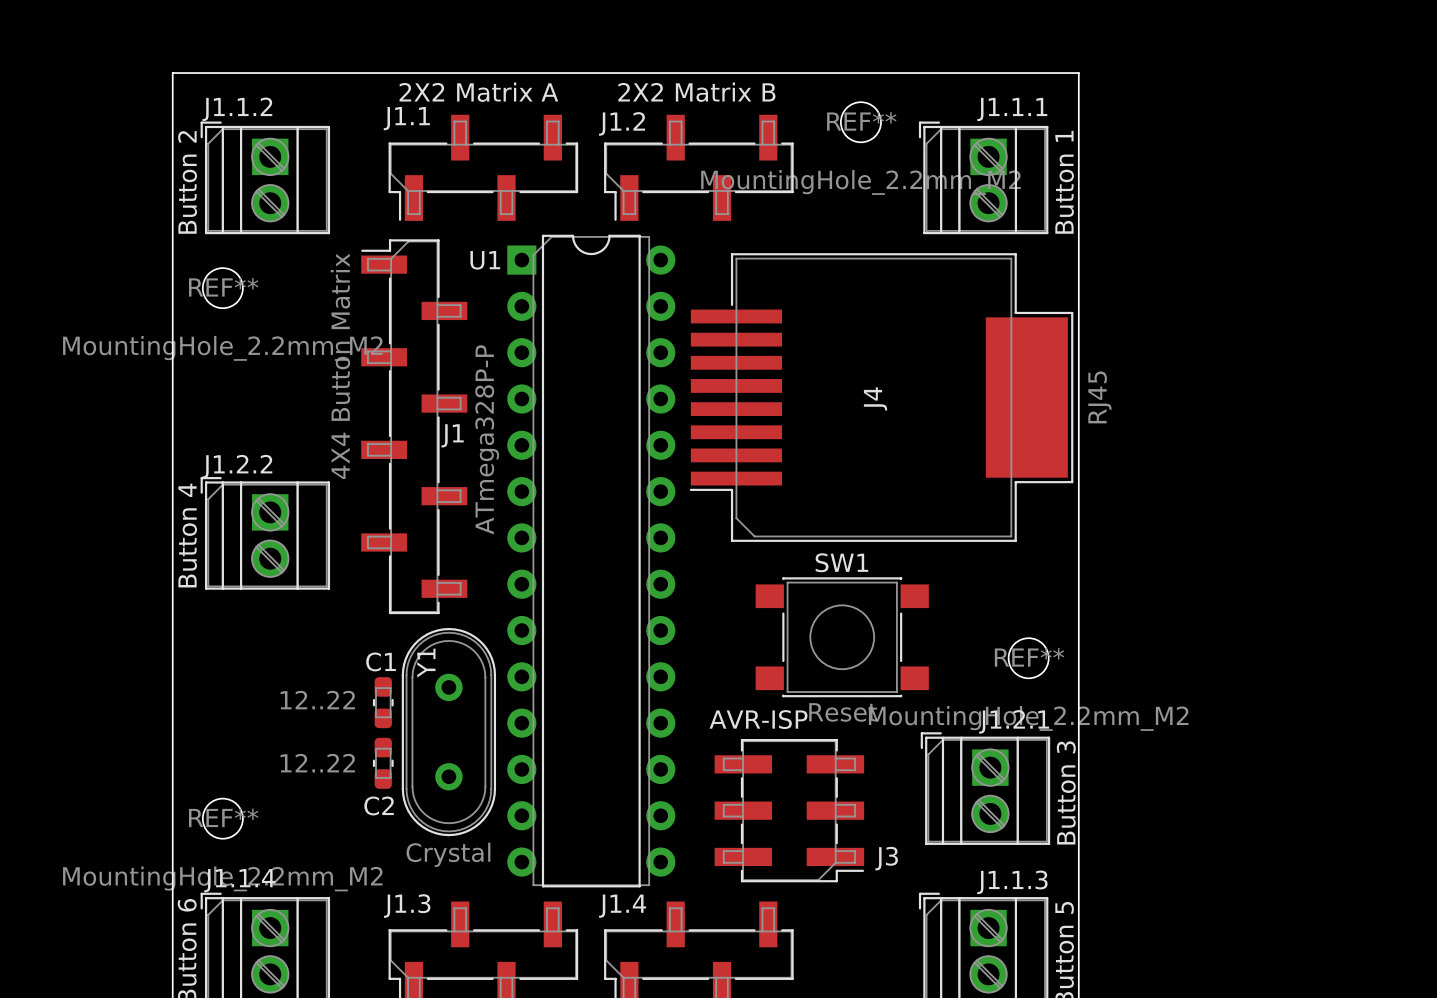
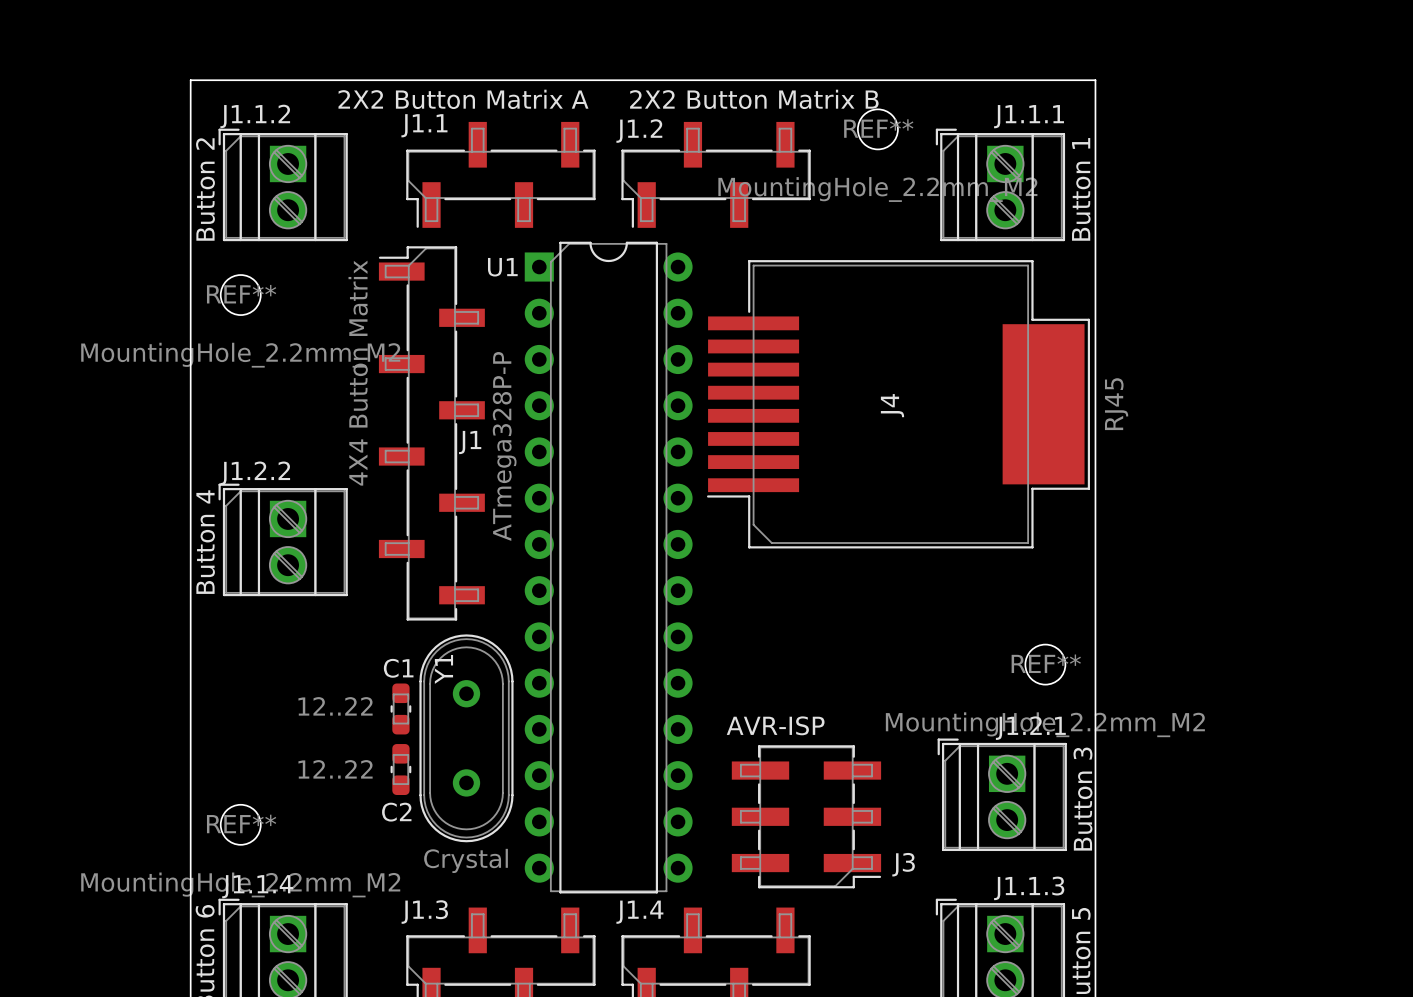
J1.1 value: 2X2 Matrix A (478, 92) -> 2X2 Button Matrix A (463, 99)
J1.2 value: 2X2 Matrix B (696, 92) -> 2X2 Button Matrix B (754, 99)
SW1: Reset (842, 637) -> none

